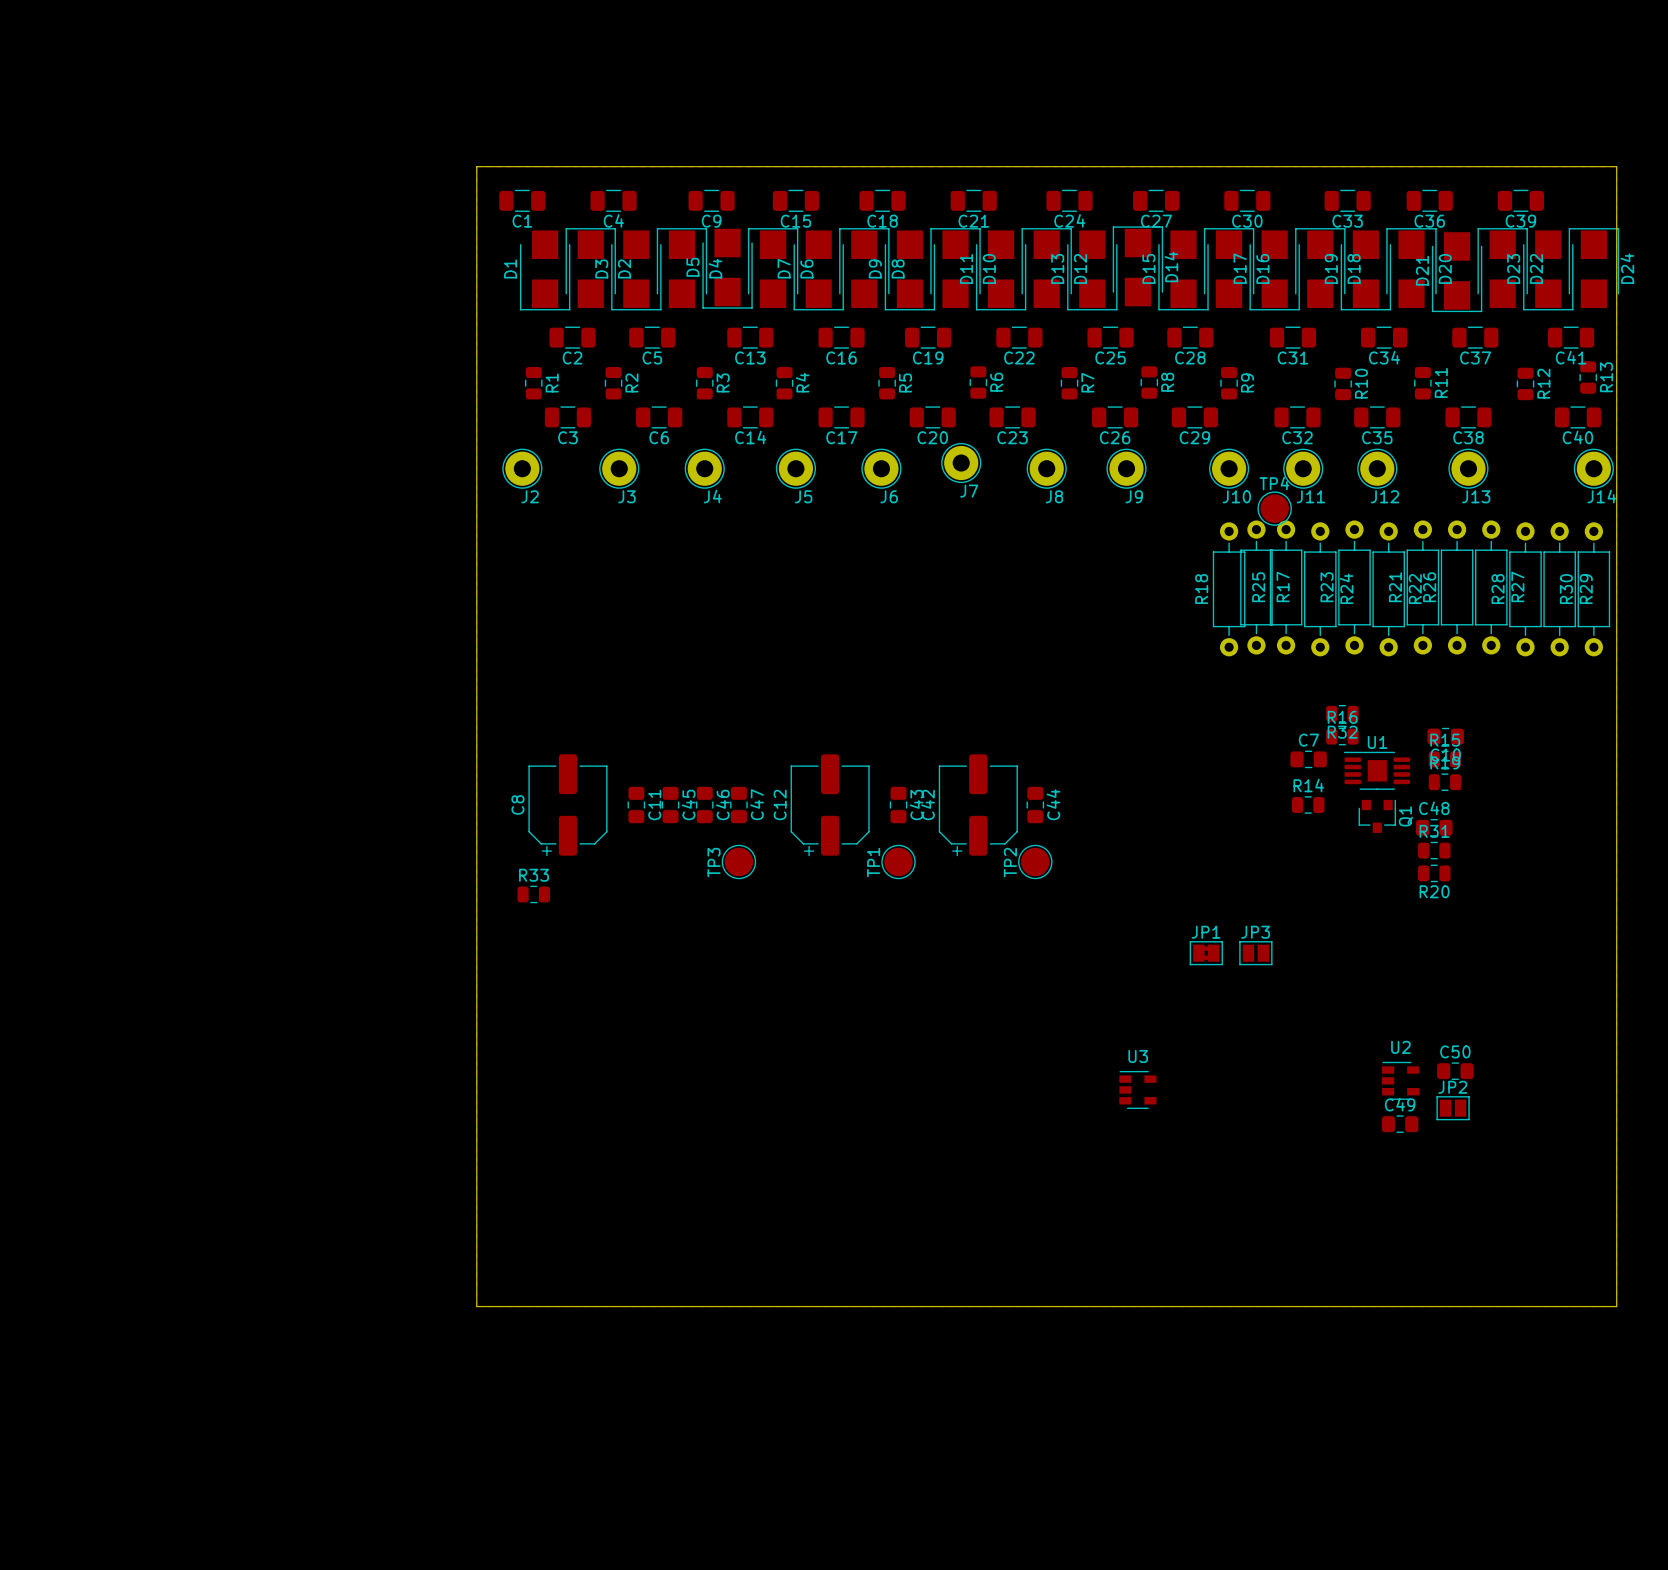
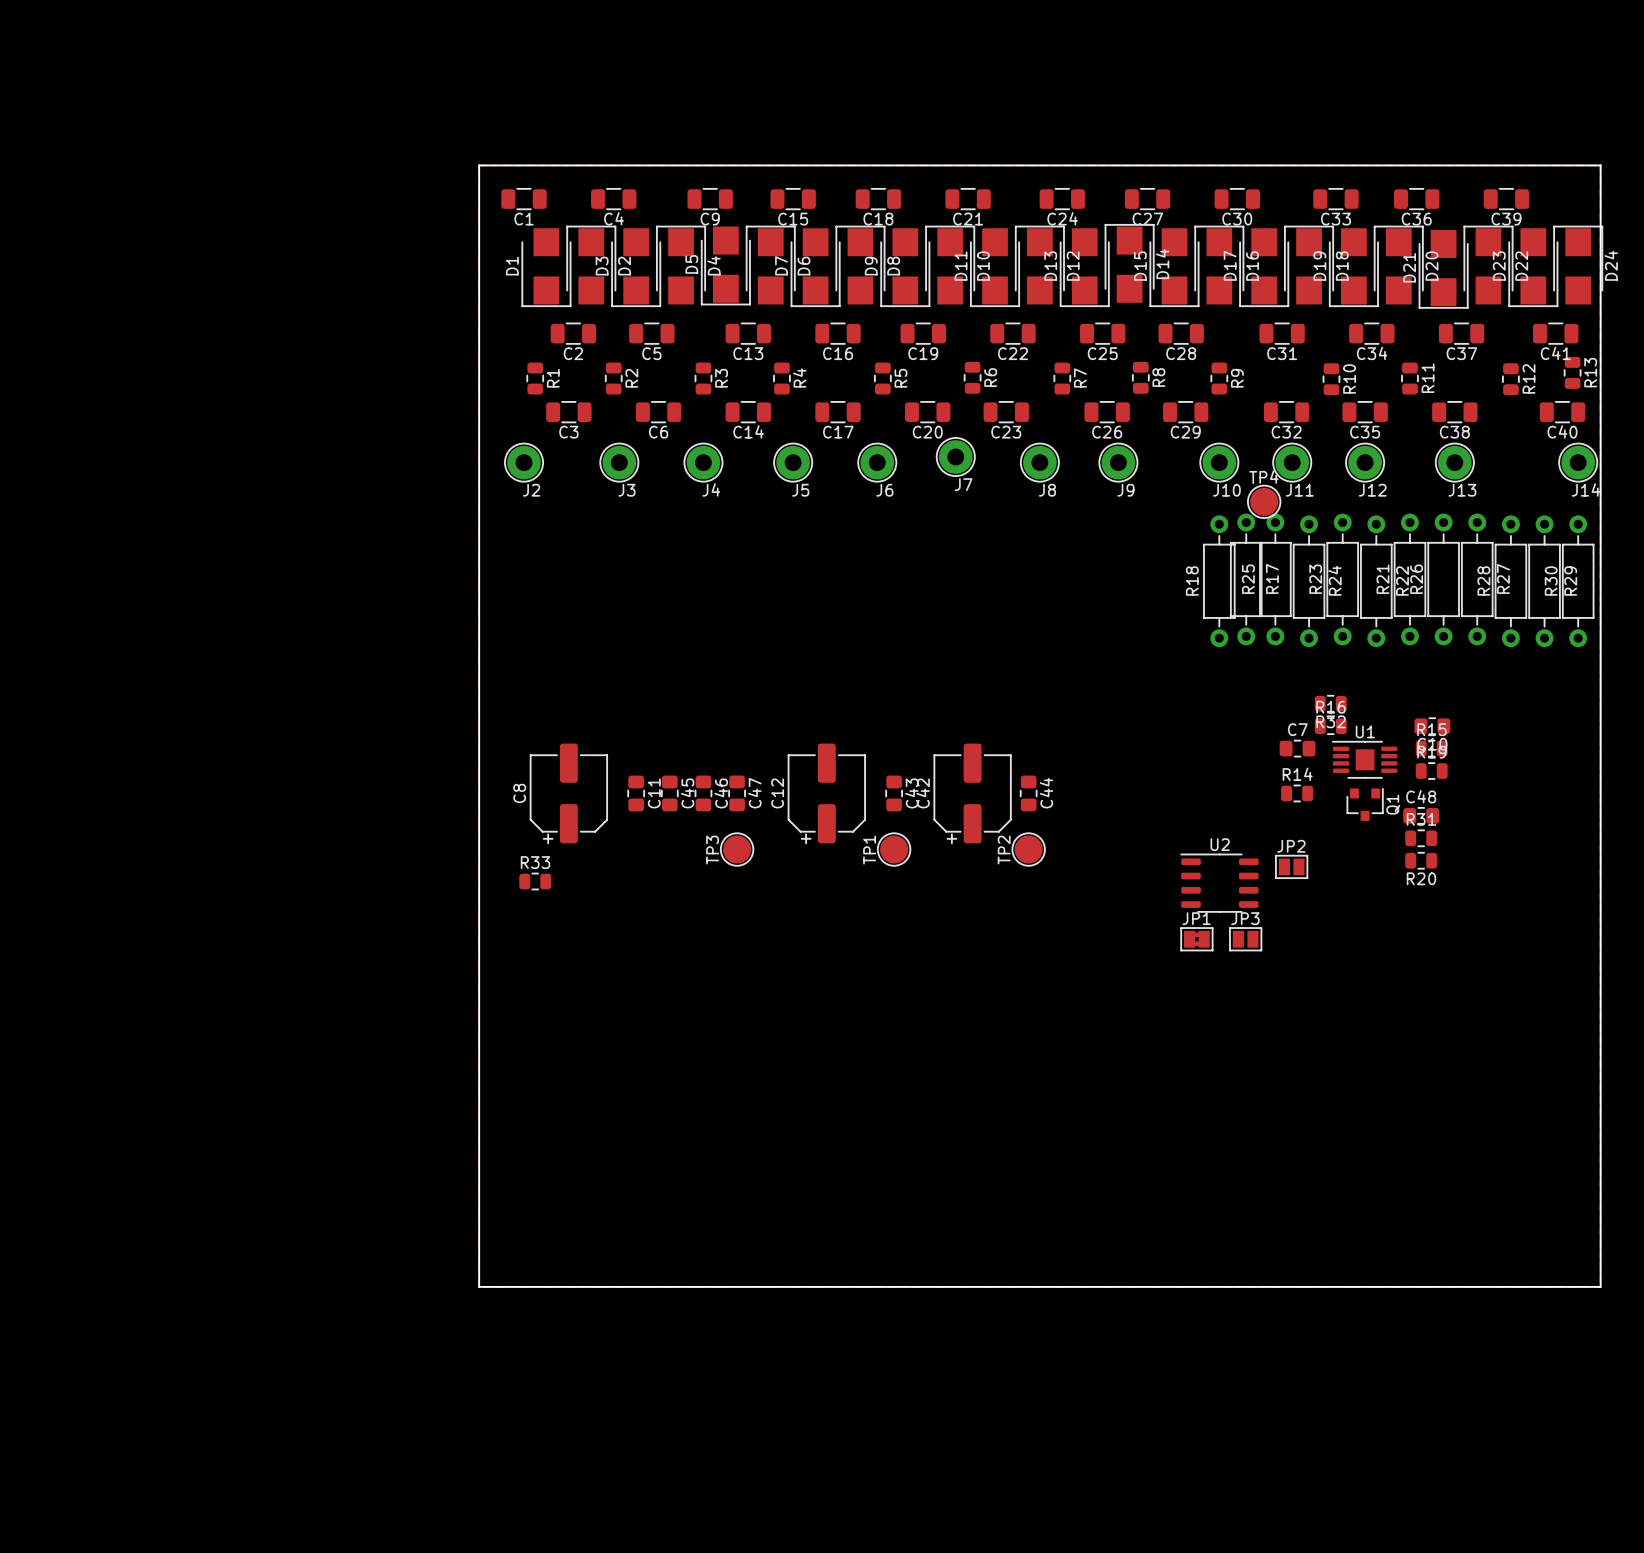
U2 footprint: [1382, 1061, 1420, 1100] -> [1180, 853, 1259, 913]
C50: (1455, 1071) -> none
U3: (1137, 1089) -> none
JP2 position: (1453, 1108) -> (1291, 866)
C49: (1400, 1124) -> none

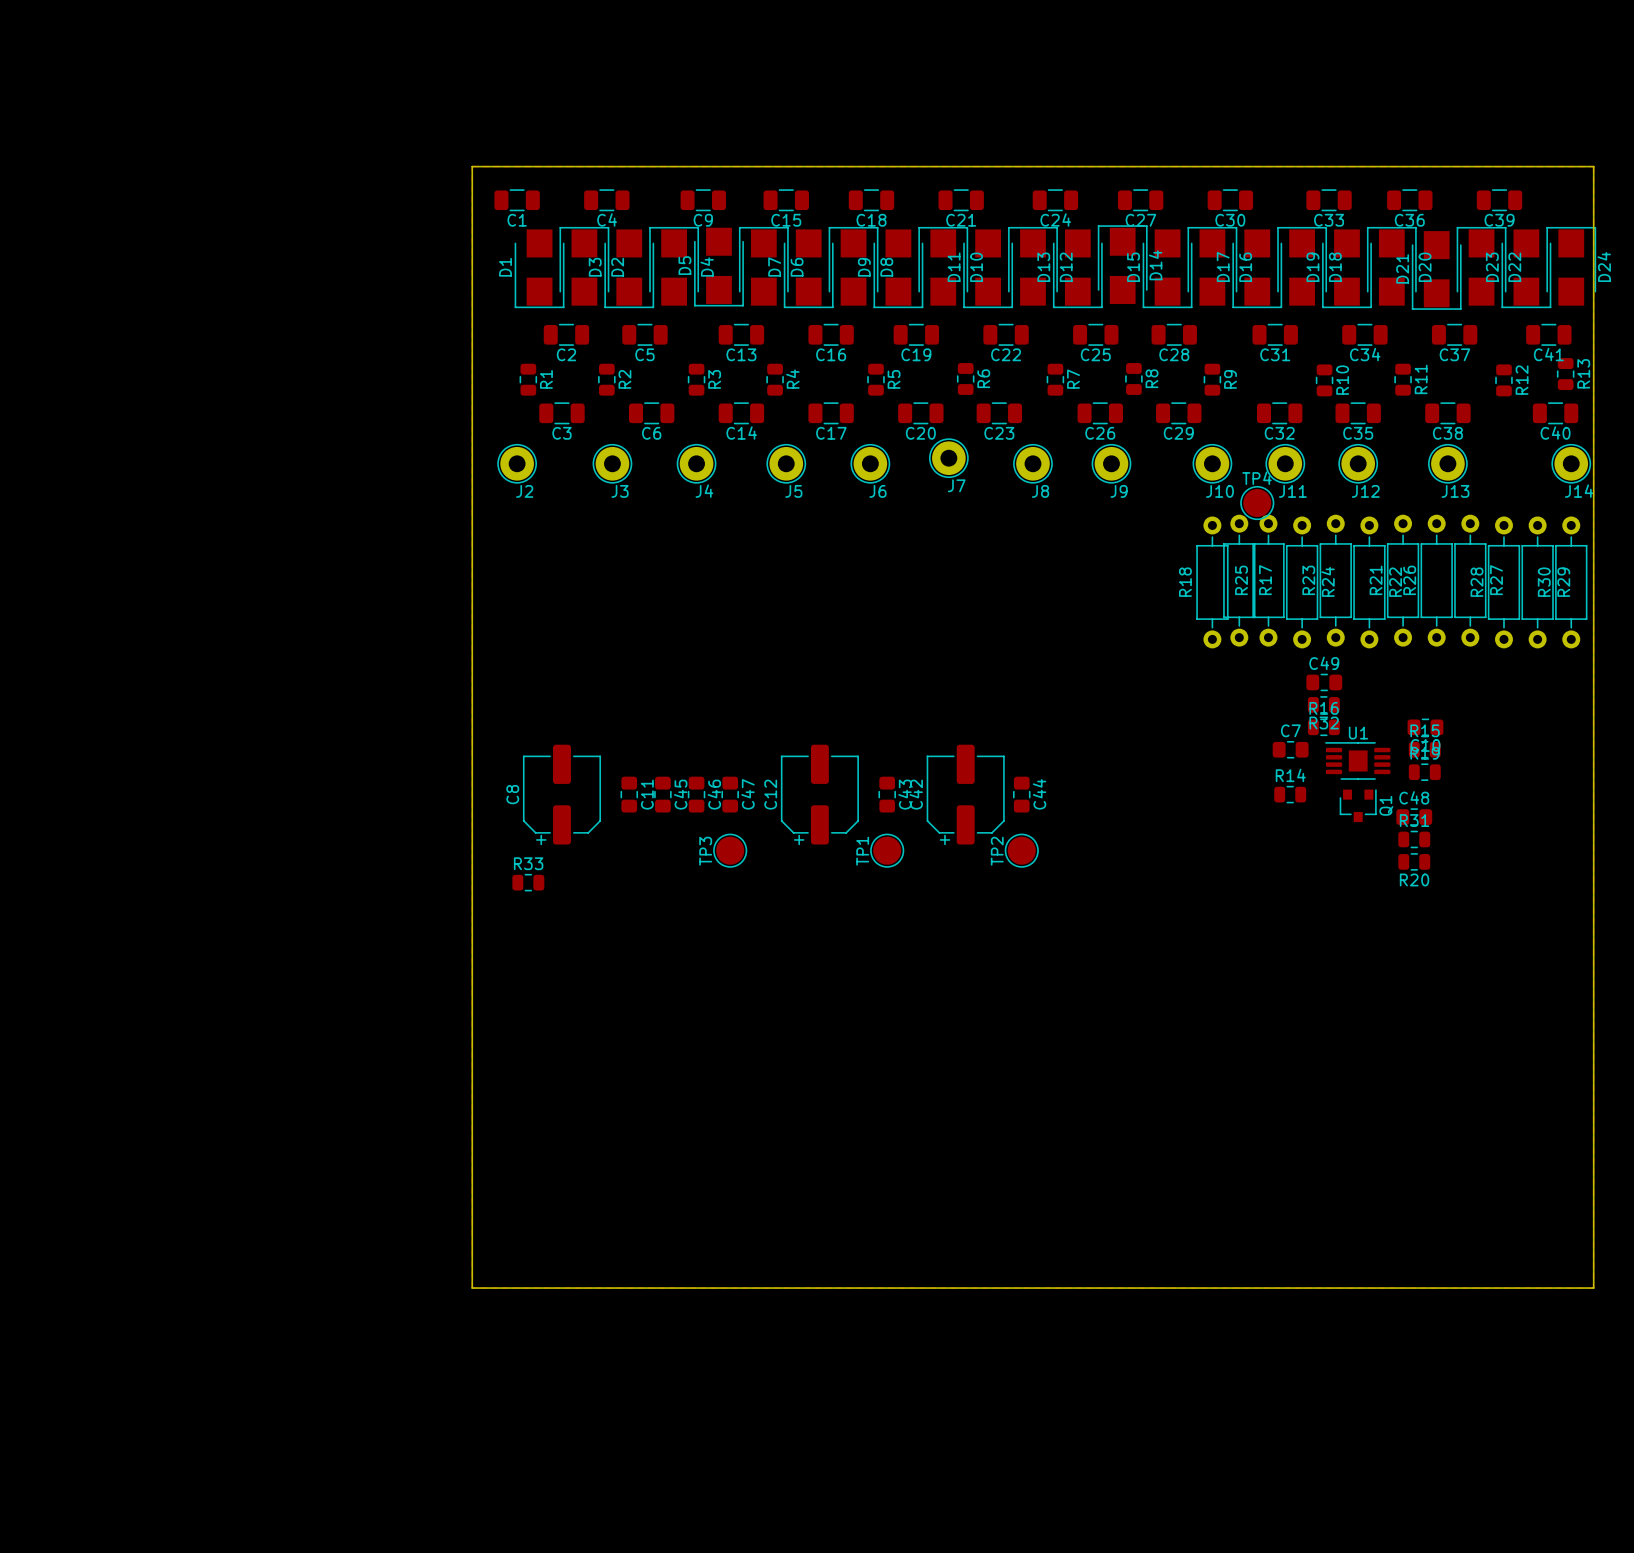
C49: none -> (1324, 682)
JP2: (1291, 866) -> none
U2: (1219, 883) -> none
JP1: (1196, 939) -> none
JP3: (1245, 939) -> none

